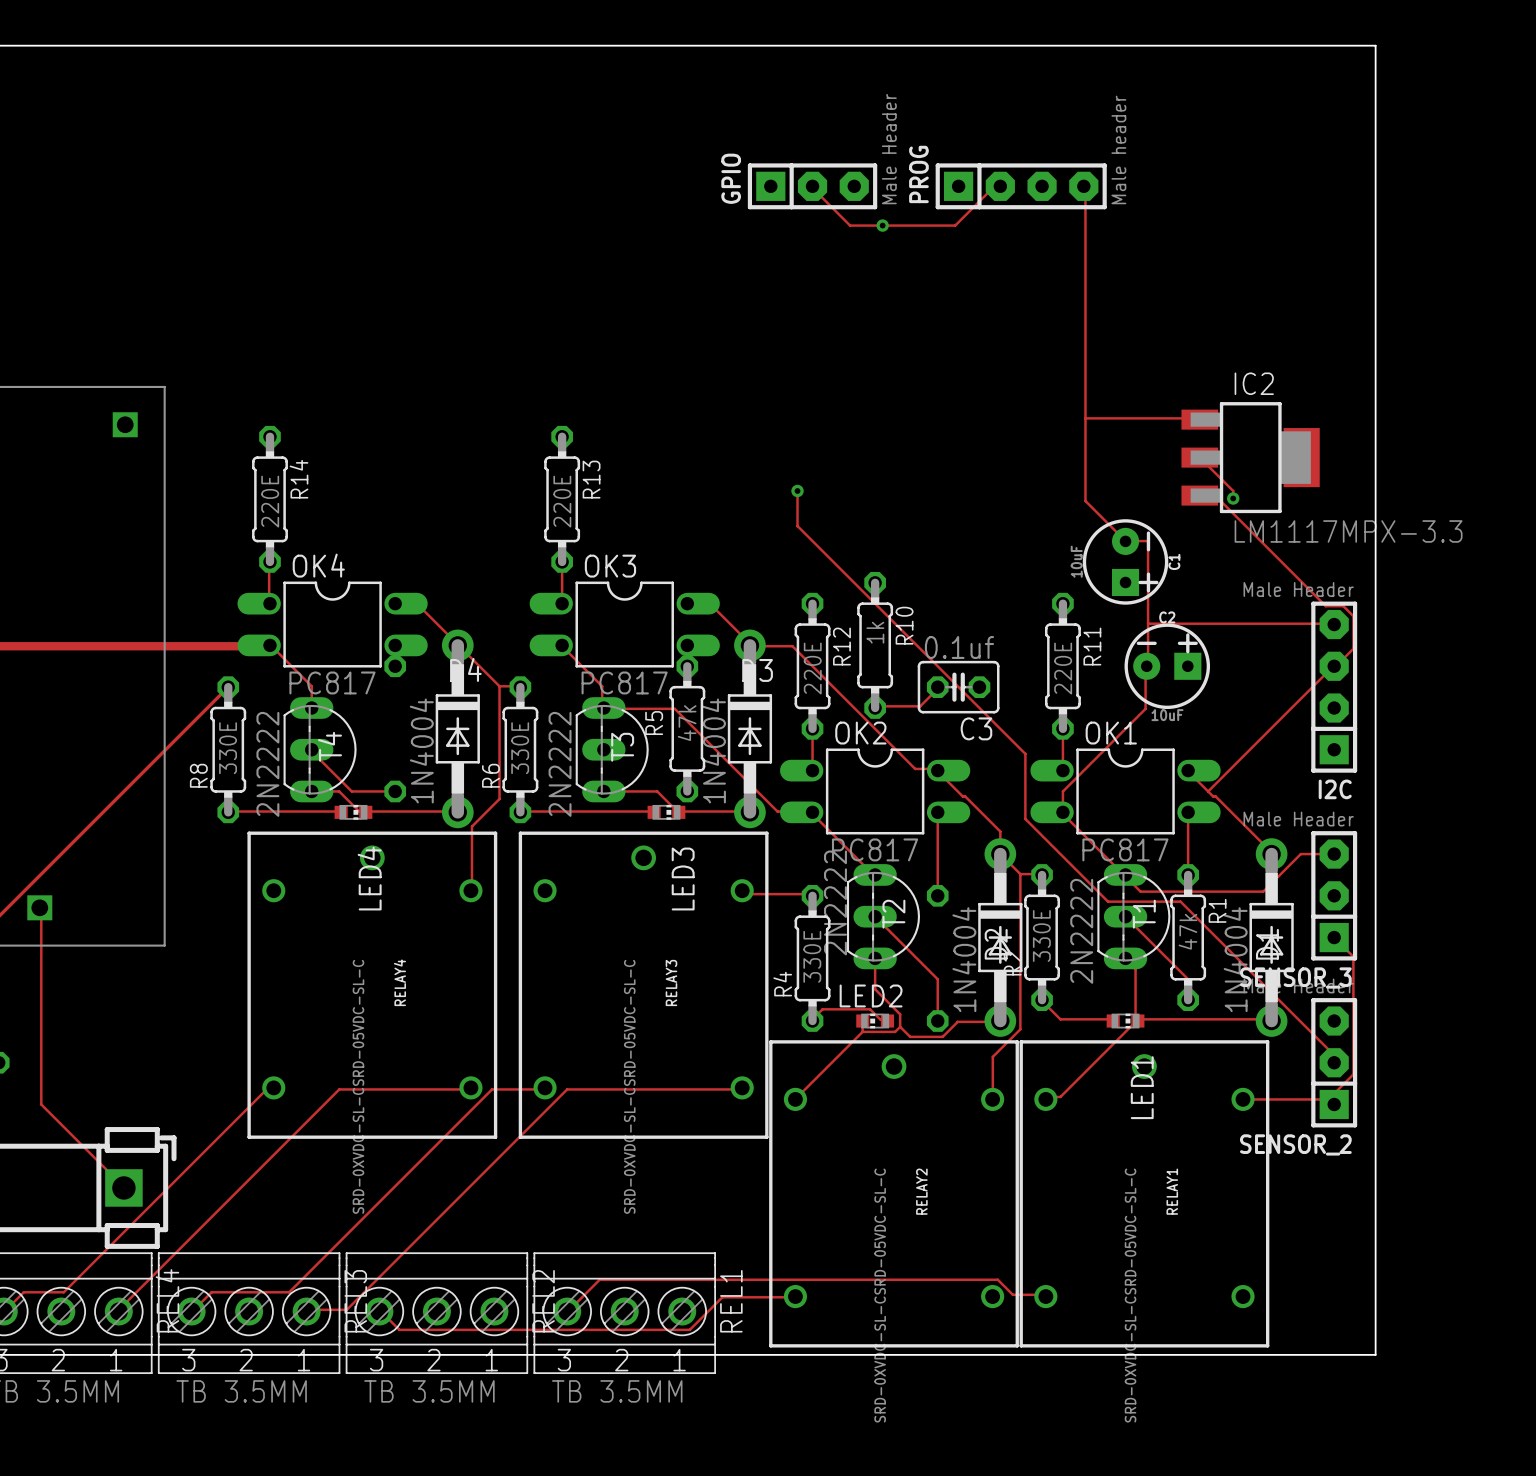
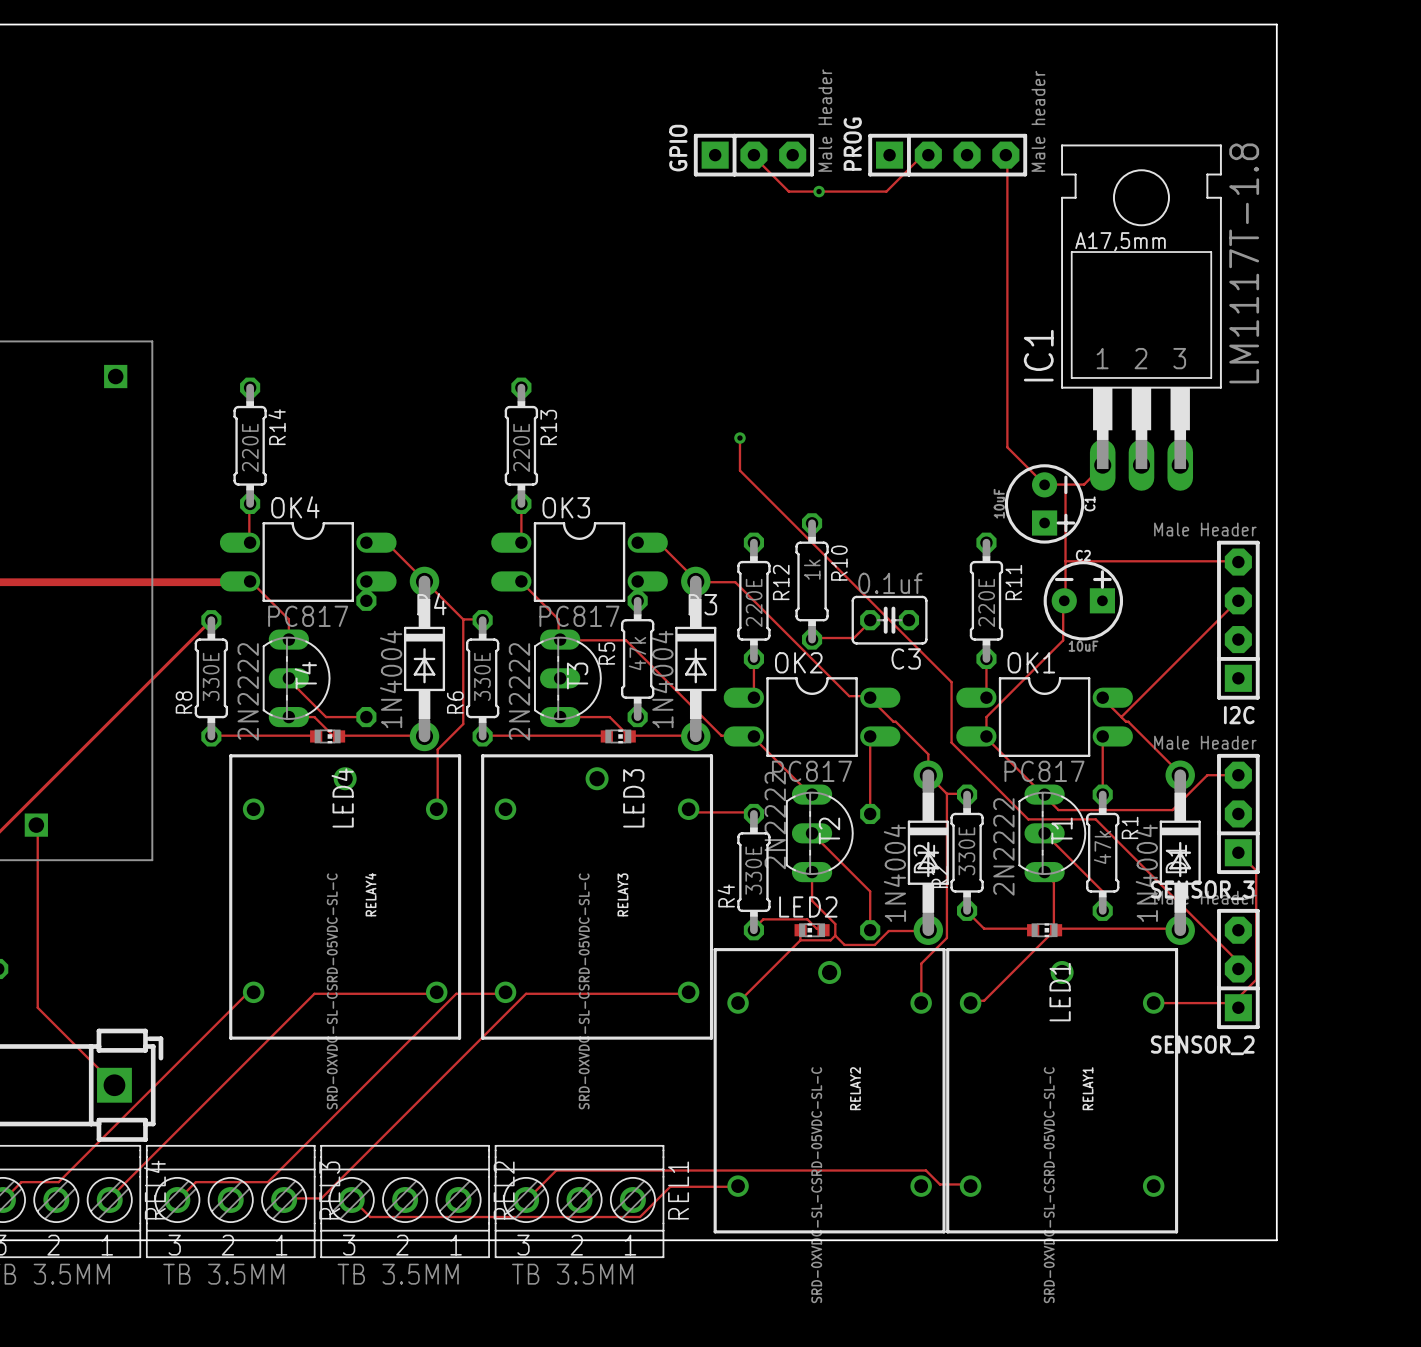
IC1: none -> LM1117T-1.8 (1141, 317)
track: (1085, 418) (1199, 419) -> none
track: (1199, 457) (1233, 490) (1233, 498) -> none
IC2: LM1117MPX-3.3 (1250, 457) -> none
track: (1199, 495) (1215, 496) (1325, 606) (1343, 606) (1353, 616) (1353, 648) (1334, 666) -> none
via: (1233, 498) -> none
track: none -> (1102, 465) (1084, 484) (1065, 484)

